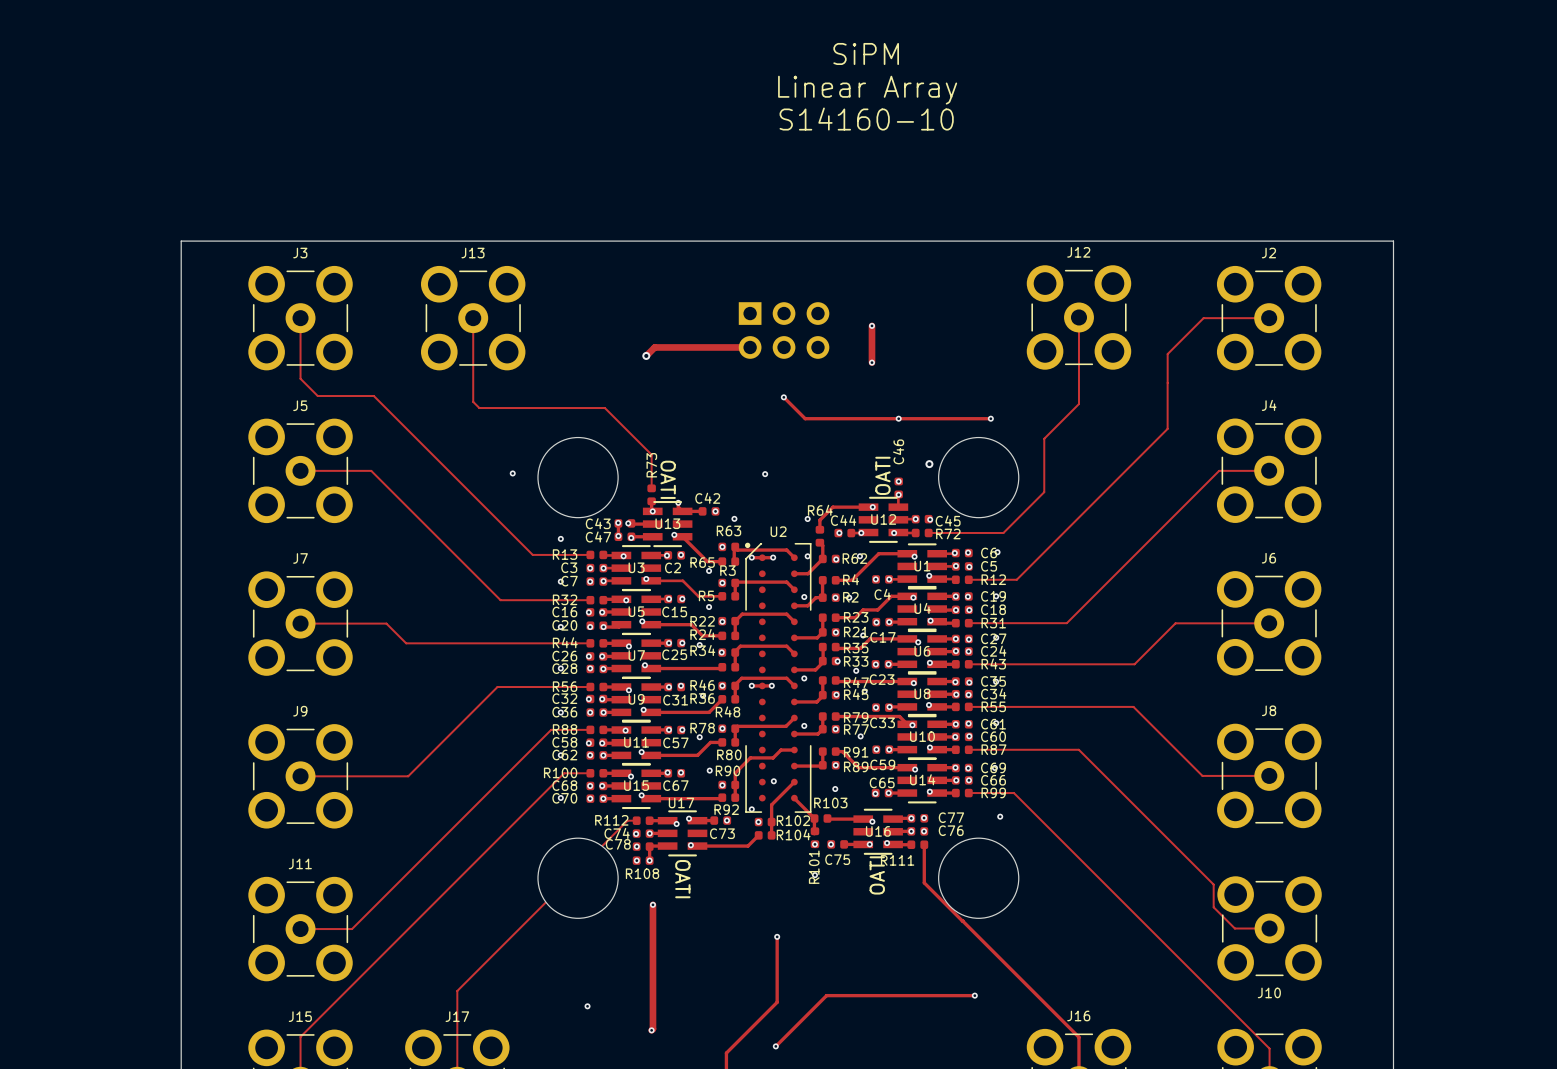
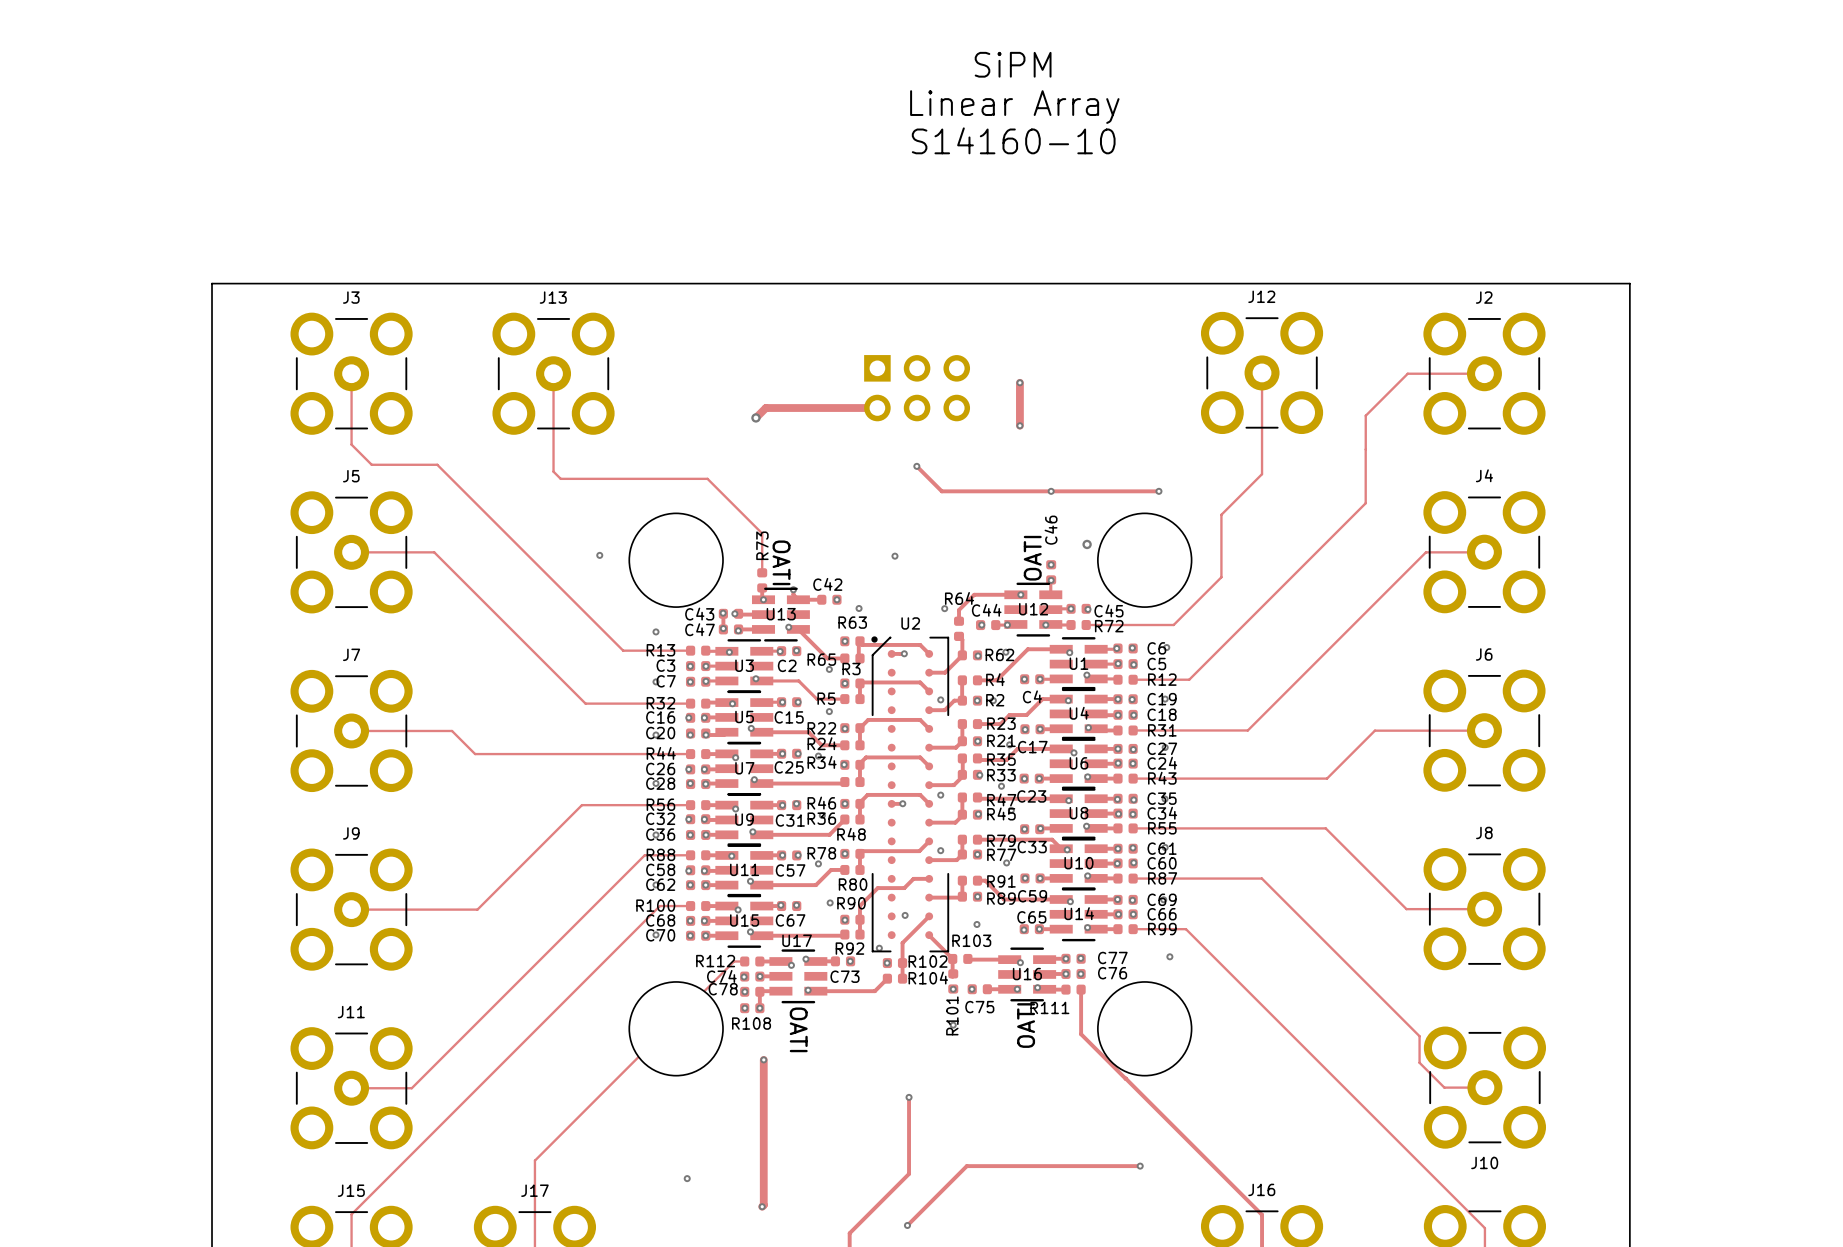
via: (807, 556) -> none
track: (751, 557) (762, 557) -> none
via: (751, 557) -> none
track: (751, 685) (762, 685) -> none
via: (751, 685) -> none

